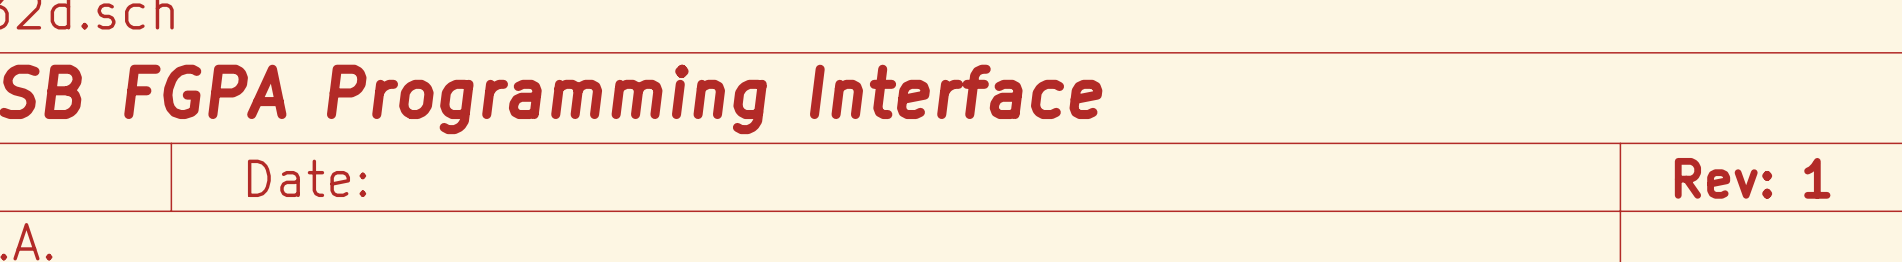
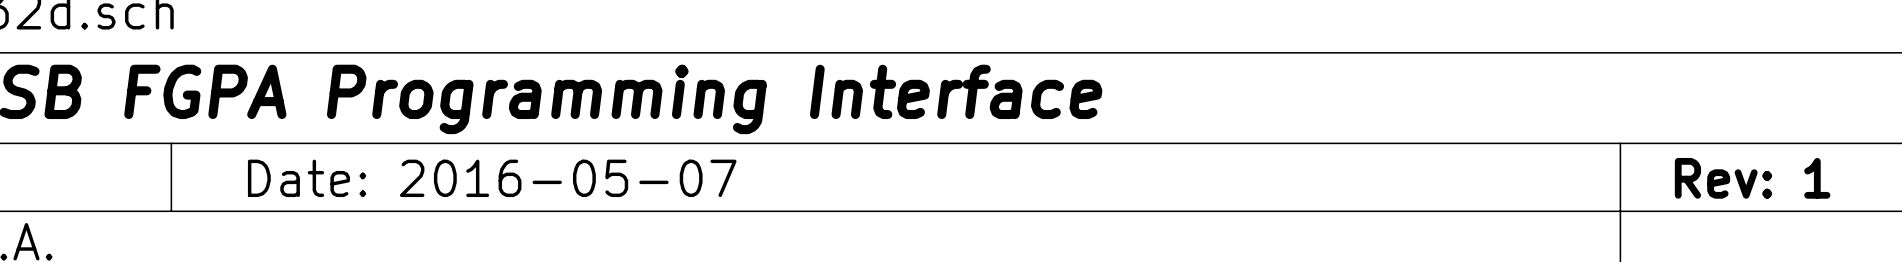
title block: Date: (307, 178) -> Date: 2016-05-07 (492, 178)

